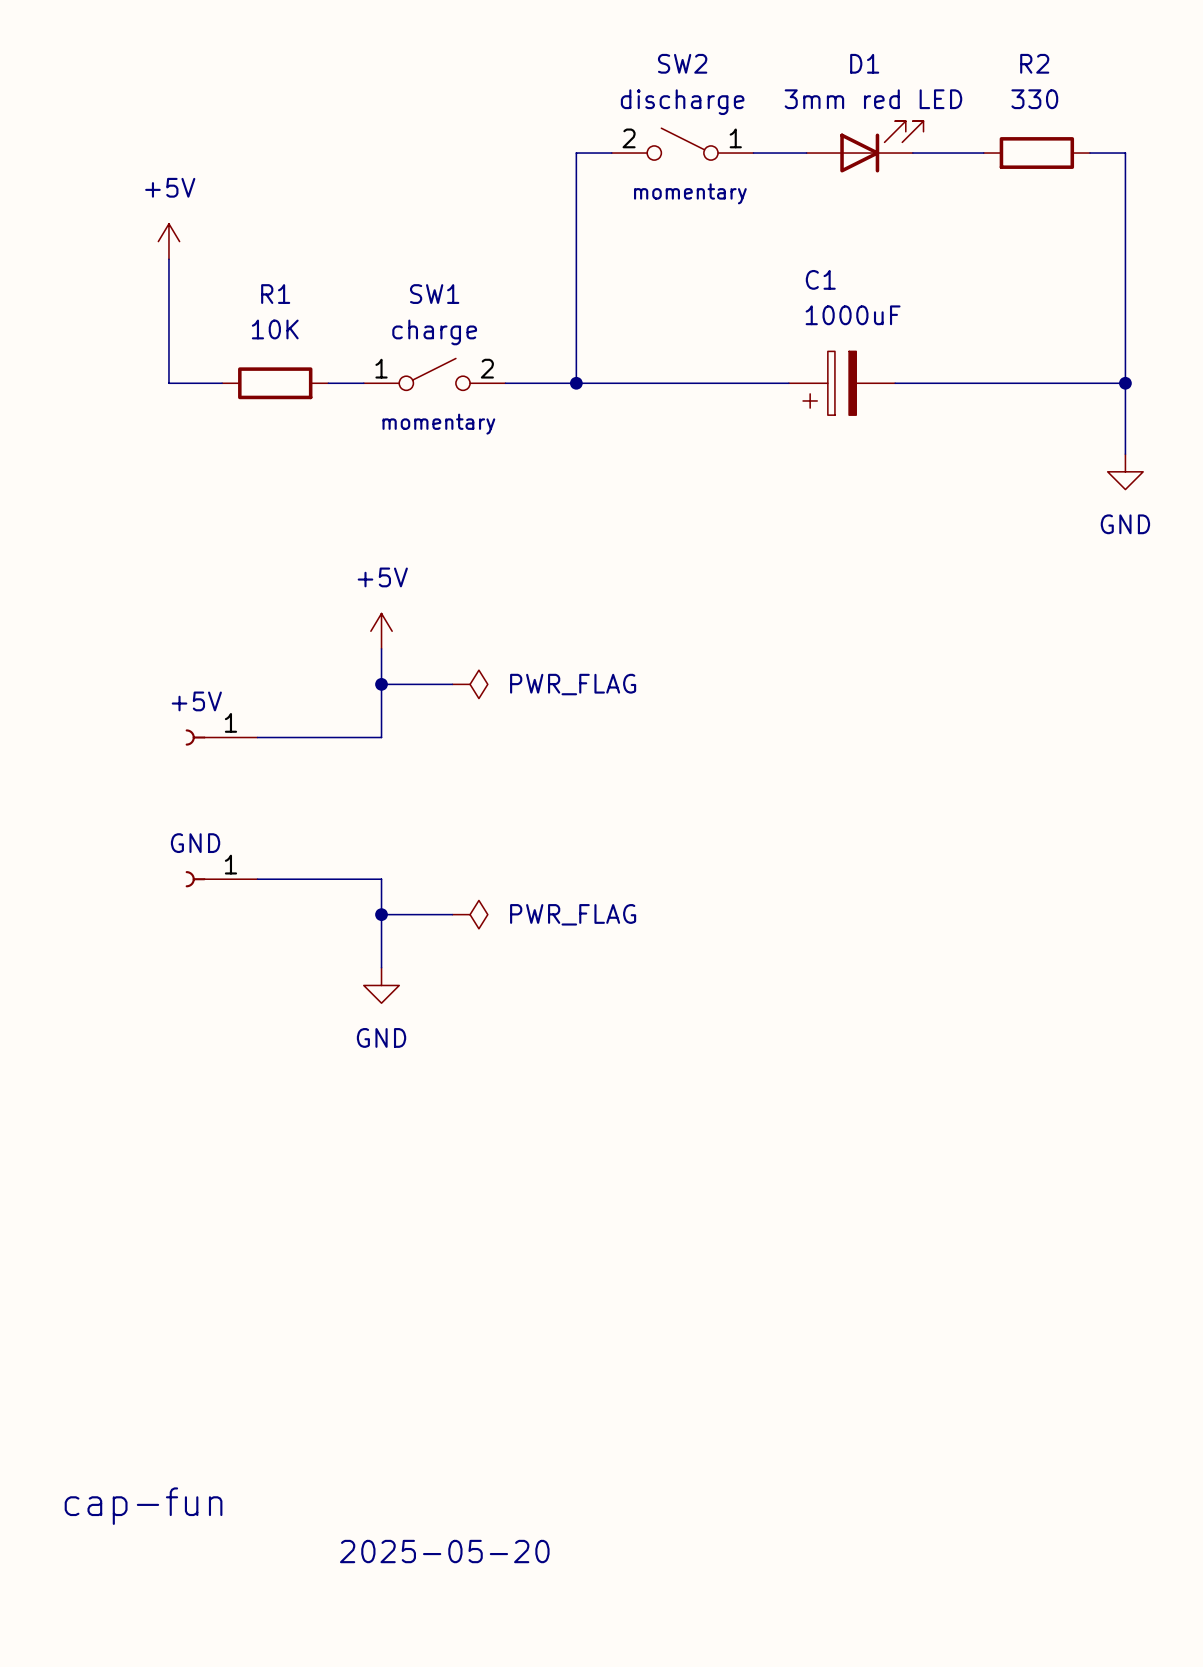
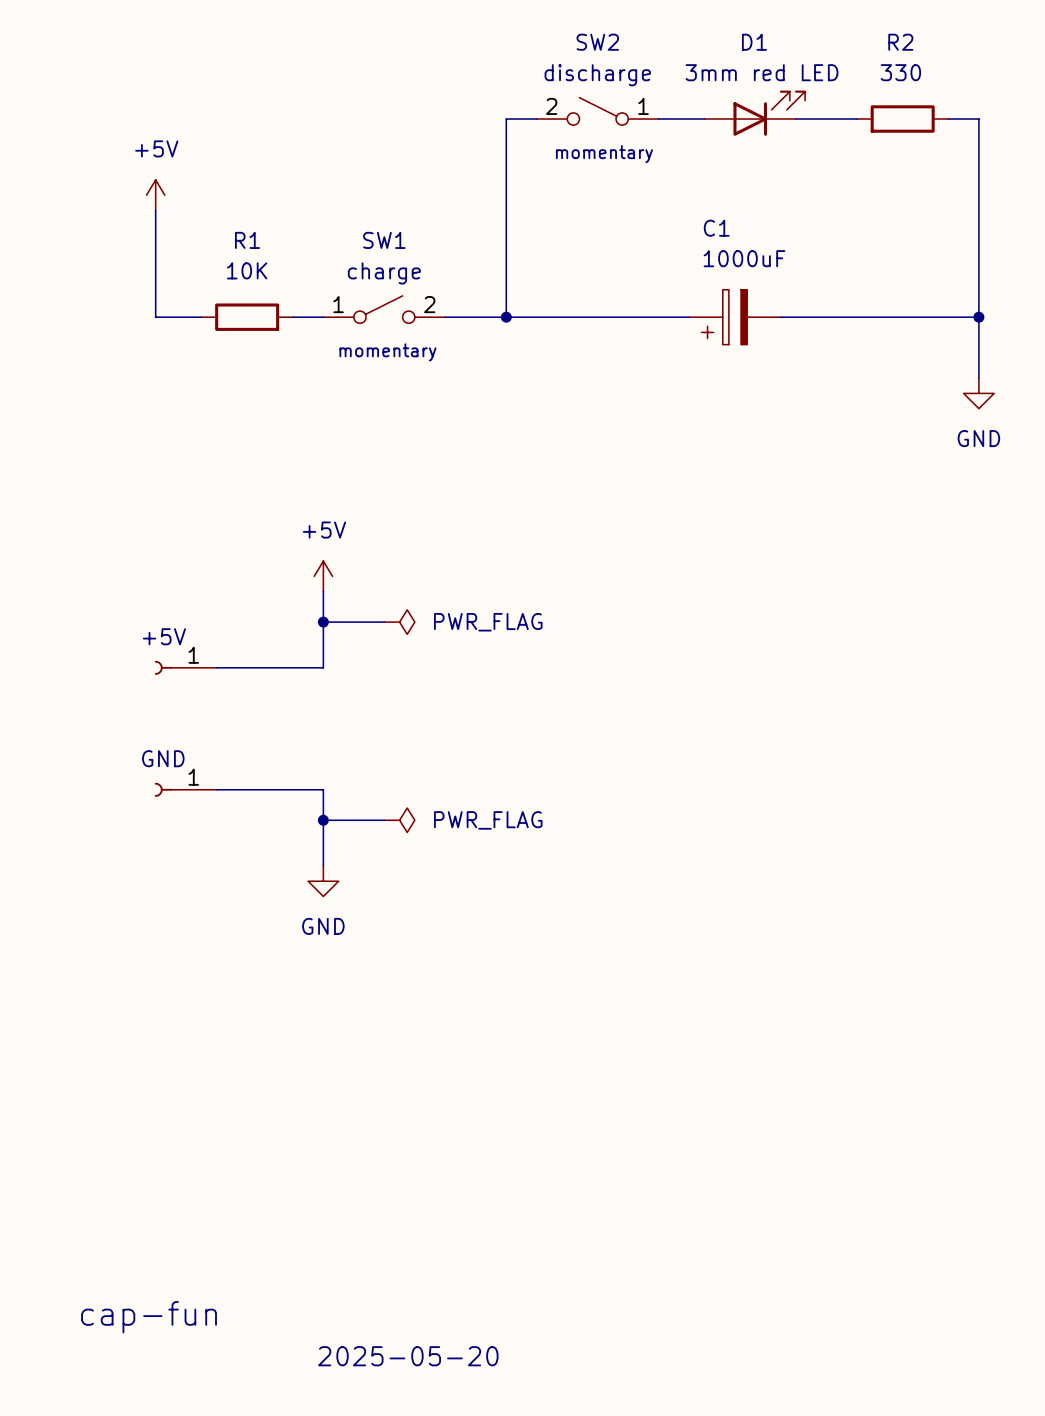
power symbol position: +5V (381, 631) -> +5V (323, 576)
wire: (381, 648) (381, 737) -> (384, 622) (338, 622)
wire: (381, 684) (452, 684) -> none
junction position: (381, 684) -> (323, 622)
power symbol position: PWR_FLAG (470, 684) -> PWR_FLAG (399, 622)
wire: none -> (323, 591) (323, 667) (216, 667)
part position: (221, 737) -> (185, 667)
wire: (257, 737) (363, 737) -> none
part position: (221, 879) -> (185, 789)
wire: (257, 879) (381, 879) (381, 967) -> (216, 789) (323, 789) (323, 866)
wire: (381, 914) (452, 914) -> (323, 820) (384, 820)
junction position: (381, 914) -> (323, 820)
power symbol position: PWR_FLAG (470, 914) -> PWR_FLAG (399, 820)
power symbol position: GND (381, 985) -> GND (323, 881)
text position: cap-fun (143, 1506) -> cap-fun (149, 1317)
text position: 2025-05-20 (444, 1551) -> 2025-05-20 (408, 1356)

